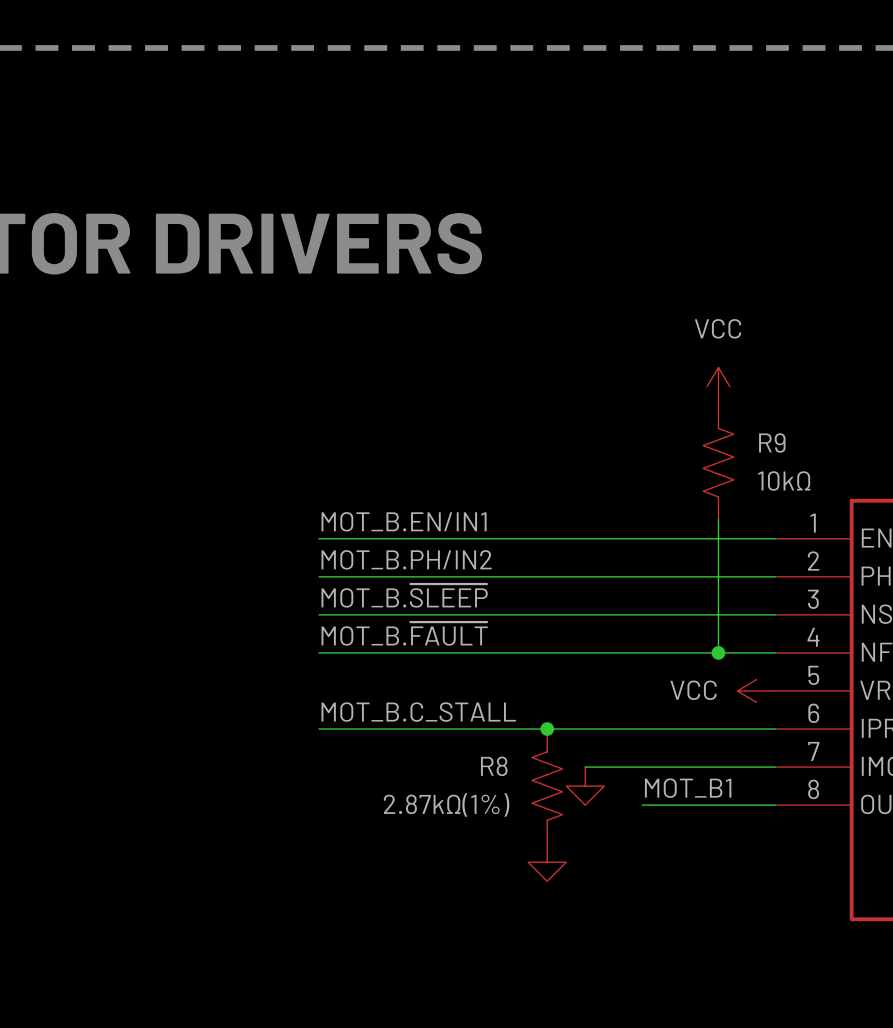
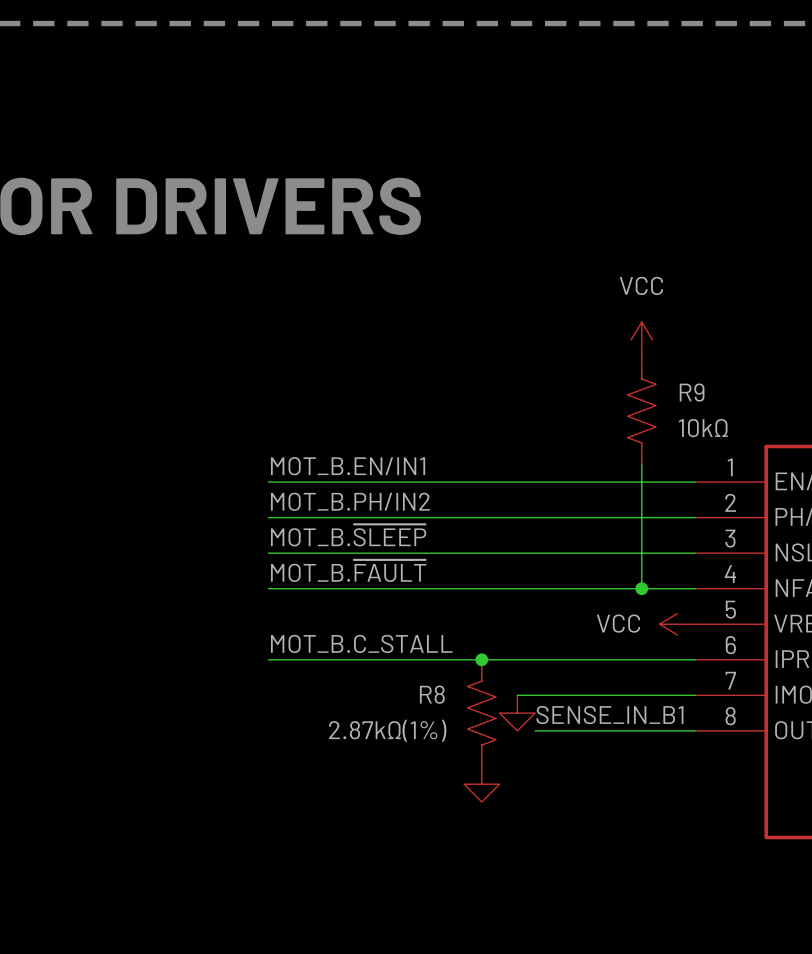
label: none -> SENSE_IN_B1 (609, 715)
label: MOT_B1 (688, 788) -> none
wire: none -> (535, 730) (570, 730)

